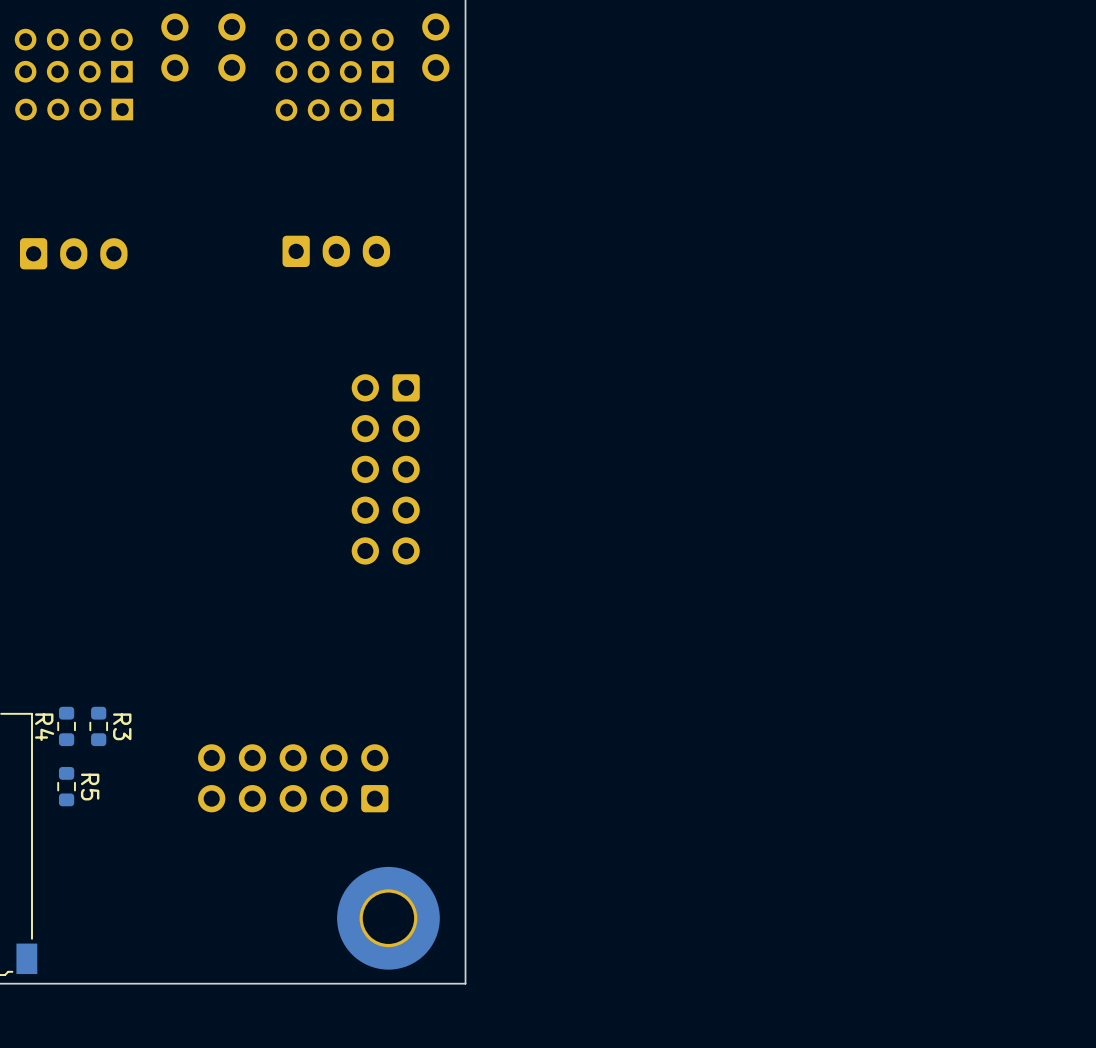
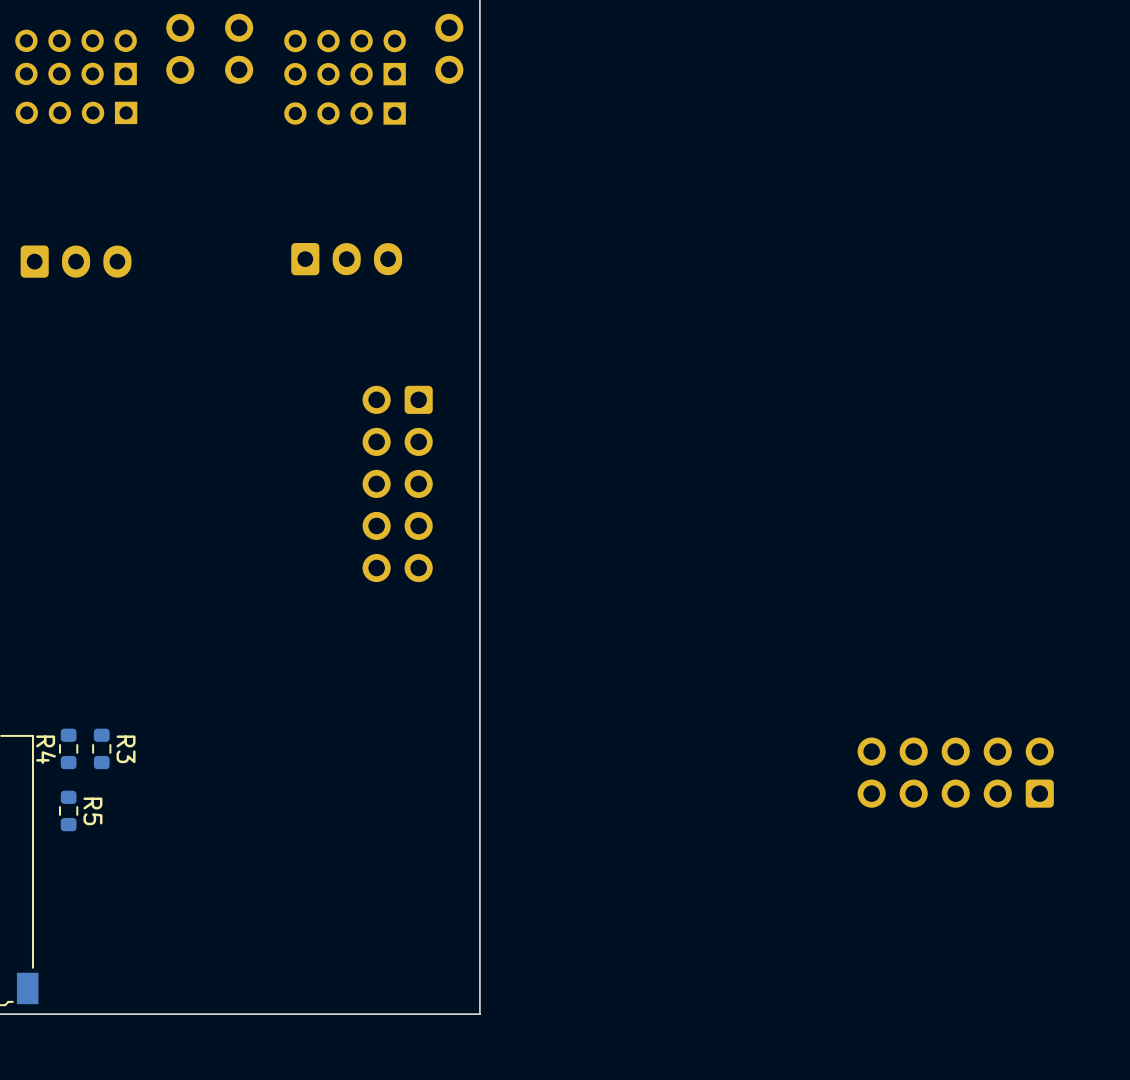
part: none -> (955, 772)
part: (293, 778) -> none
part: (388, 918) -> none

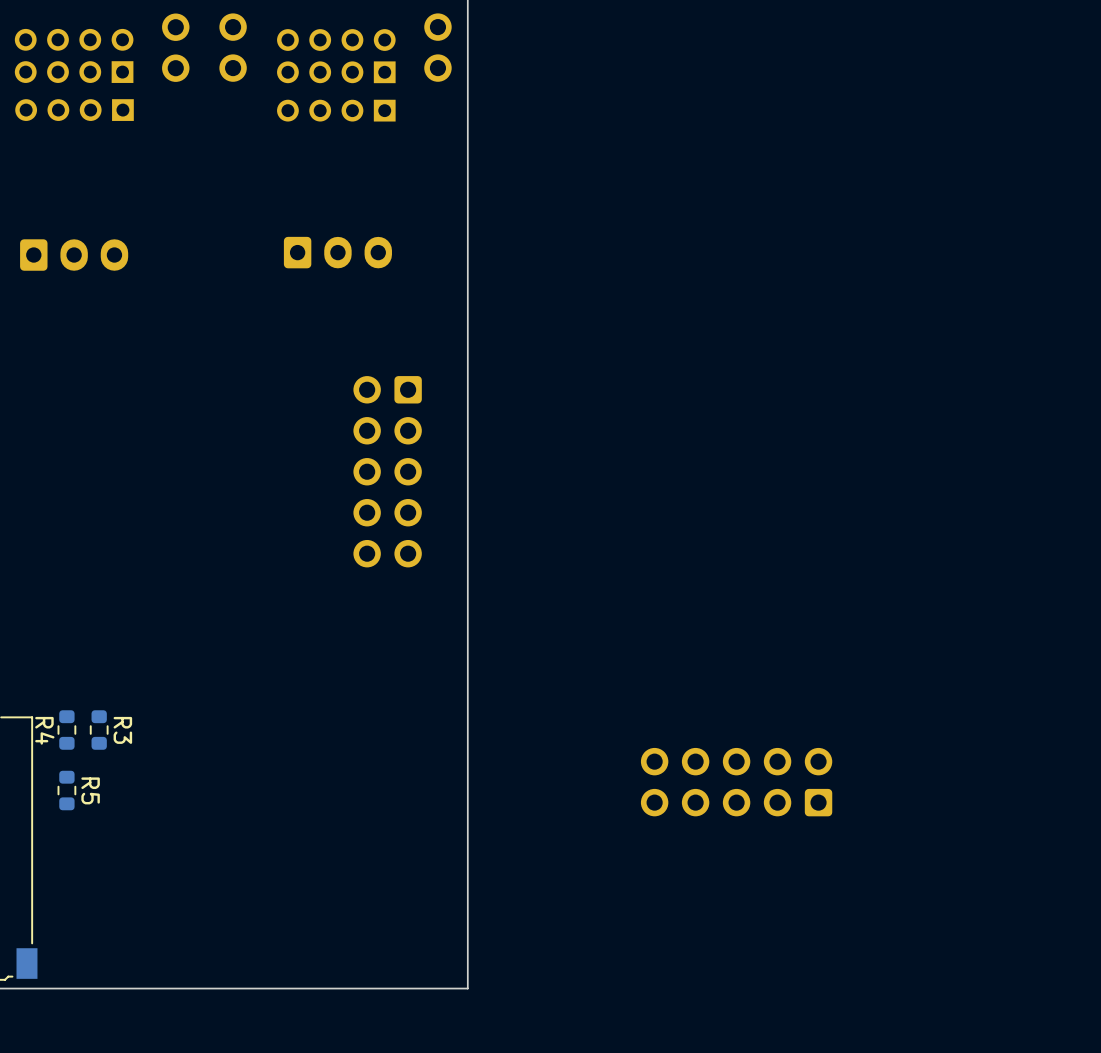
part position: (955, 772) -> (736, 782)

